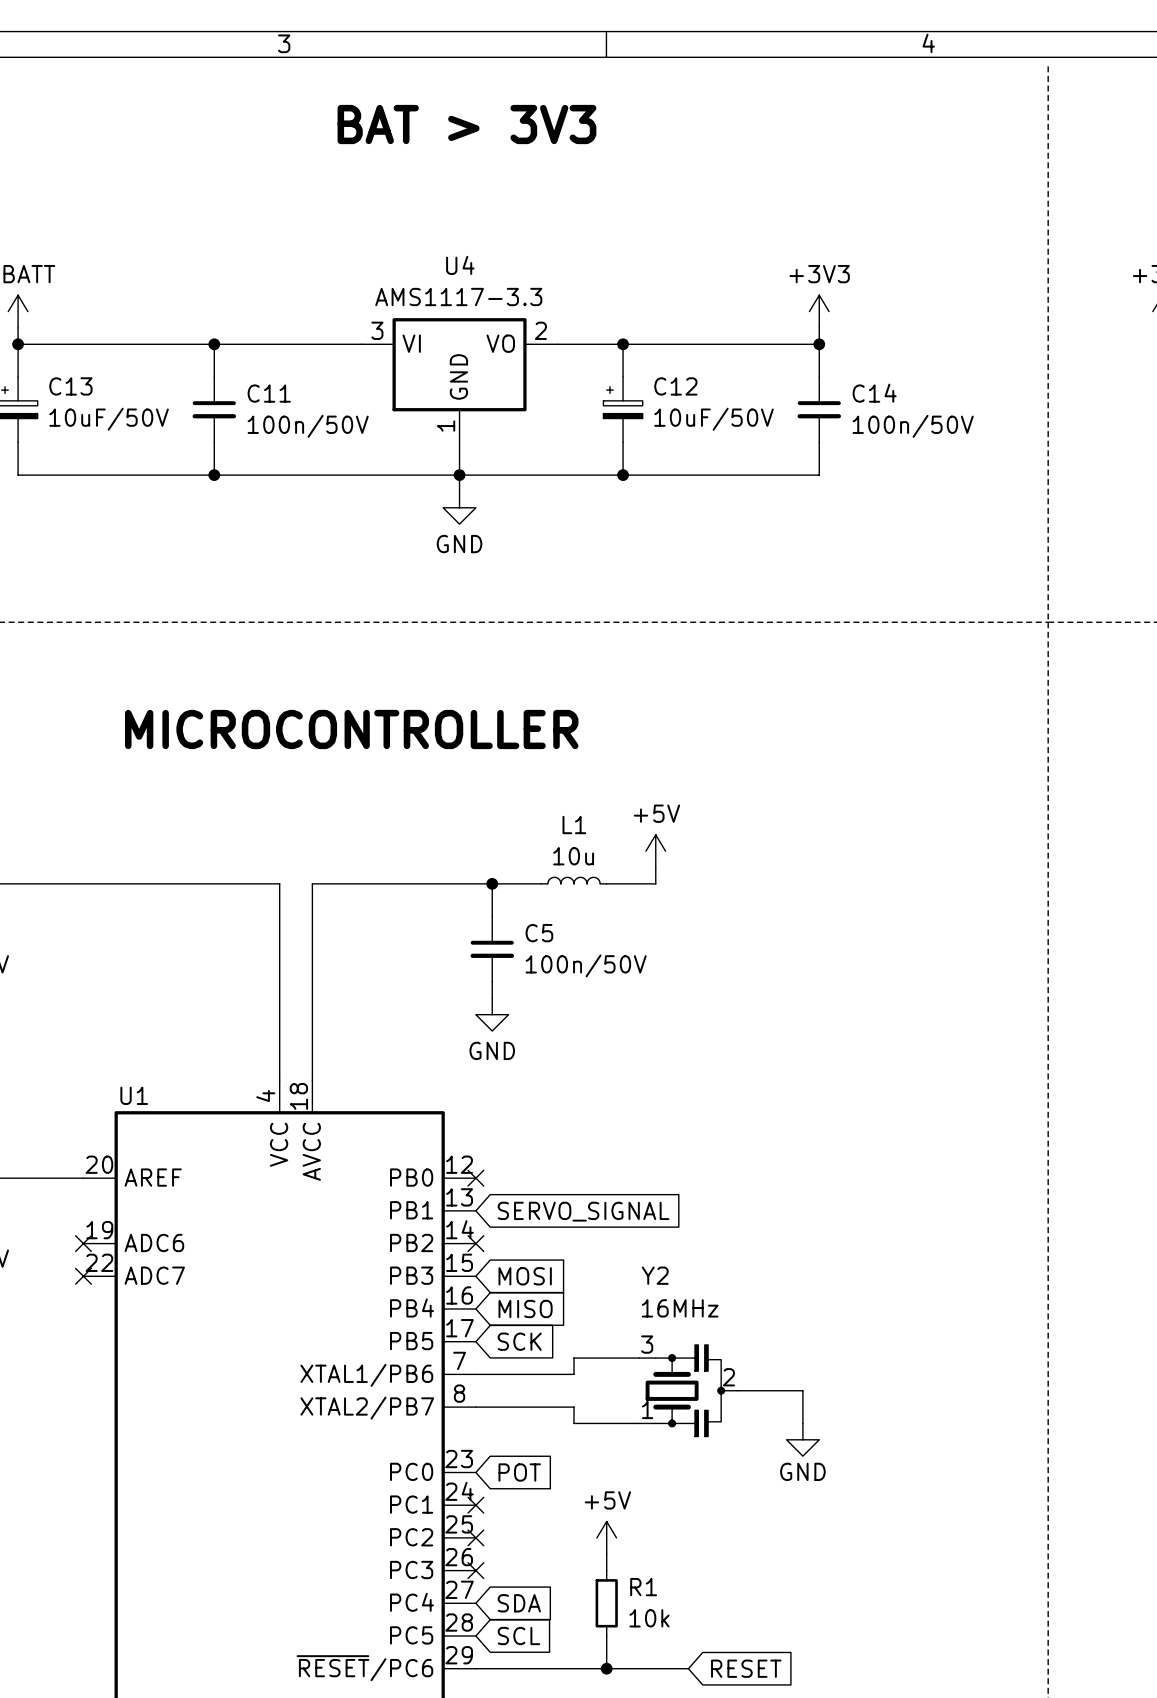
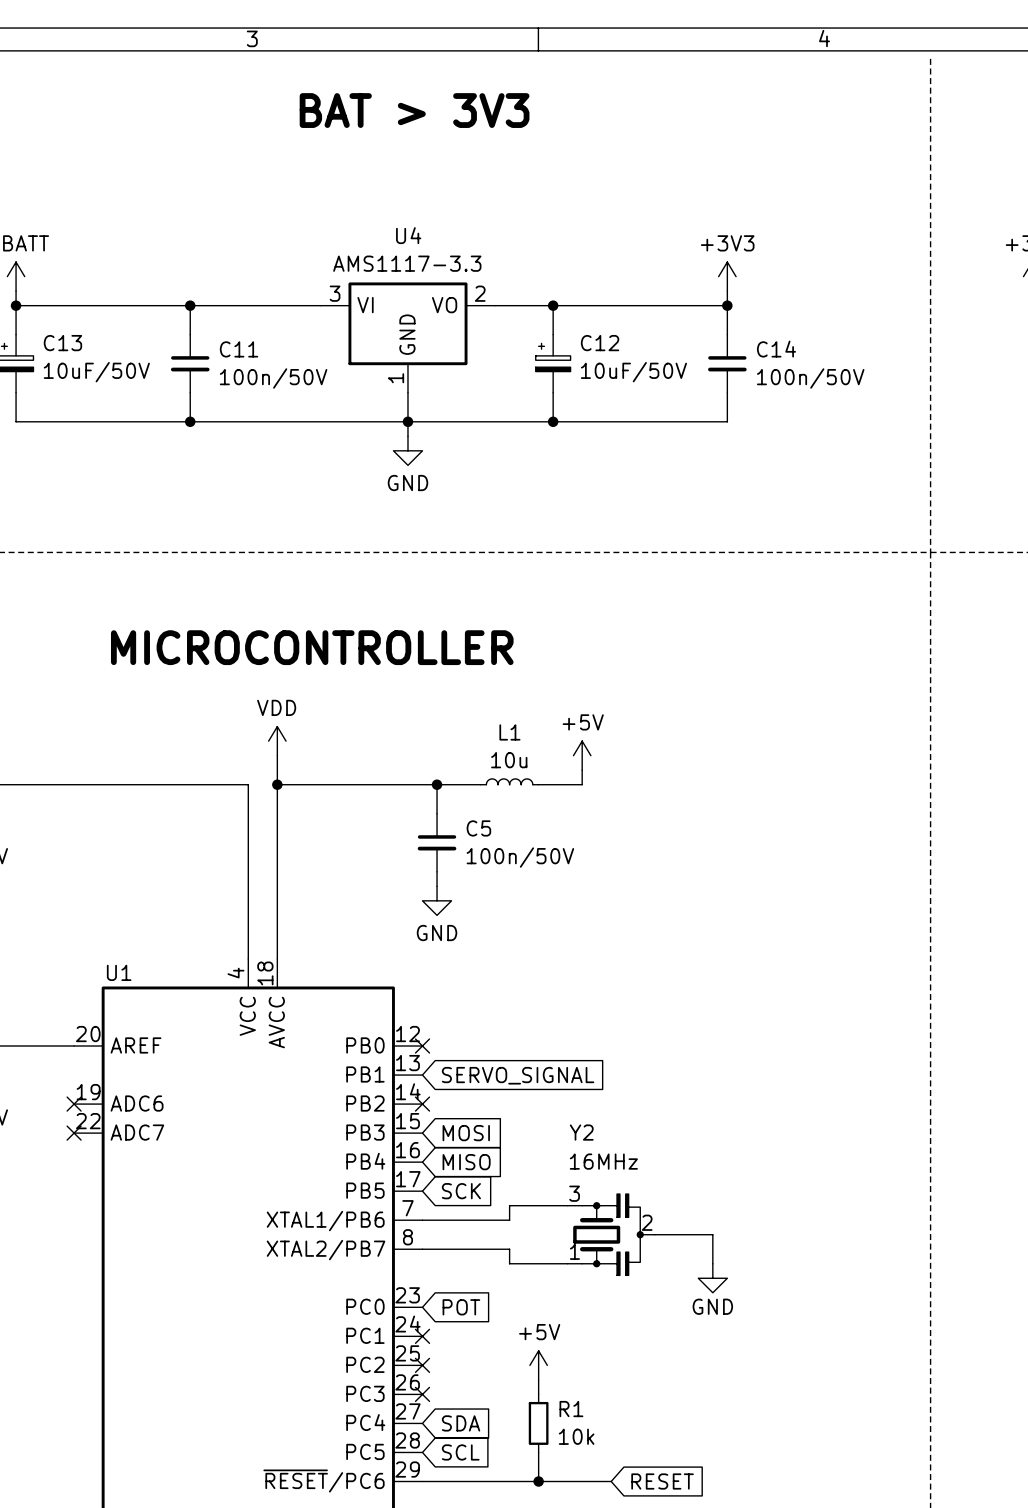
power symbol: none -> VDD (277, 741)
wire: none -> (277, 755) (277, 784)
junction: none -> (277, 784)

